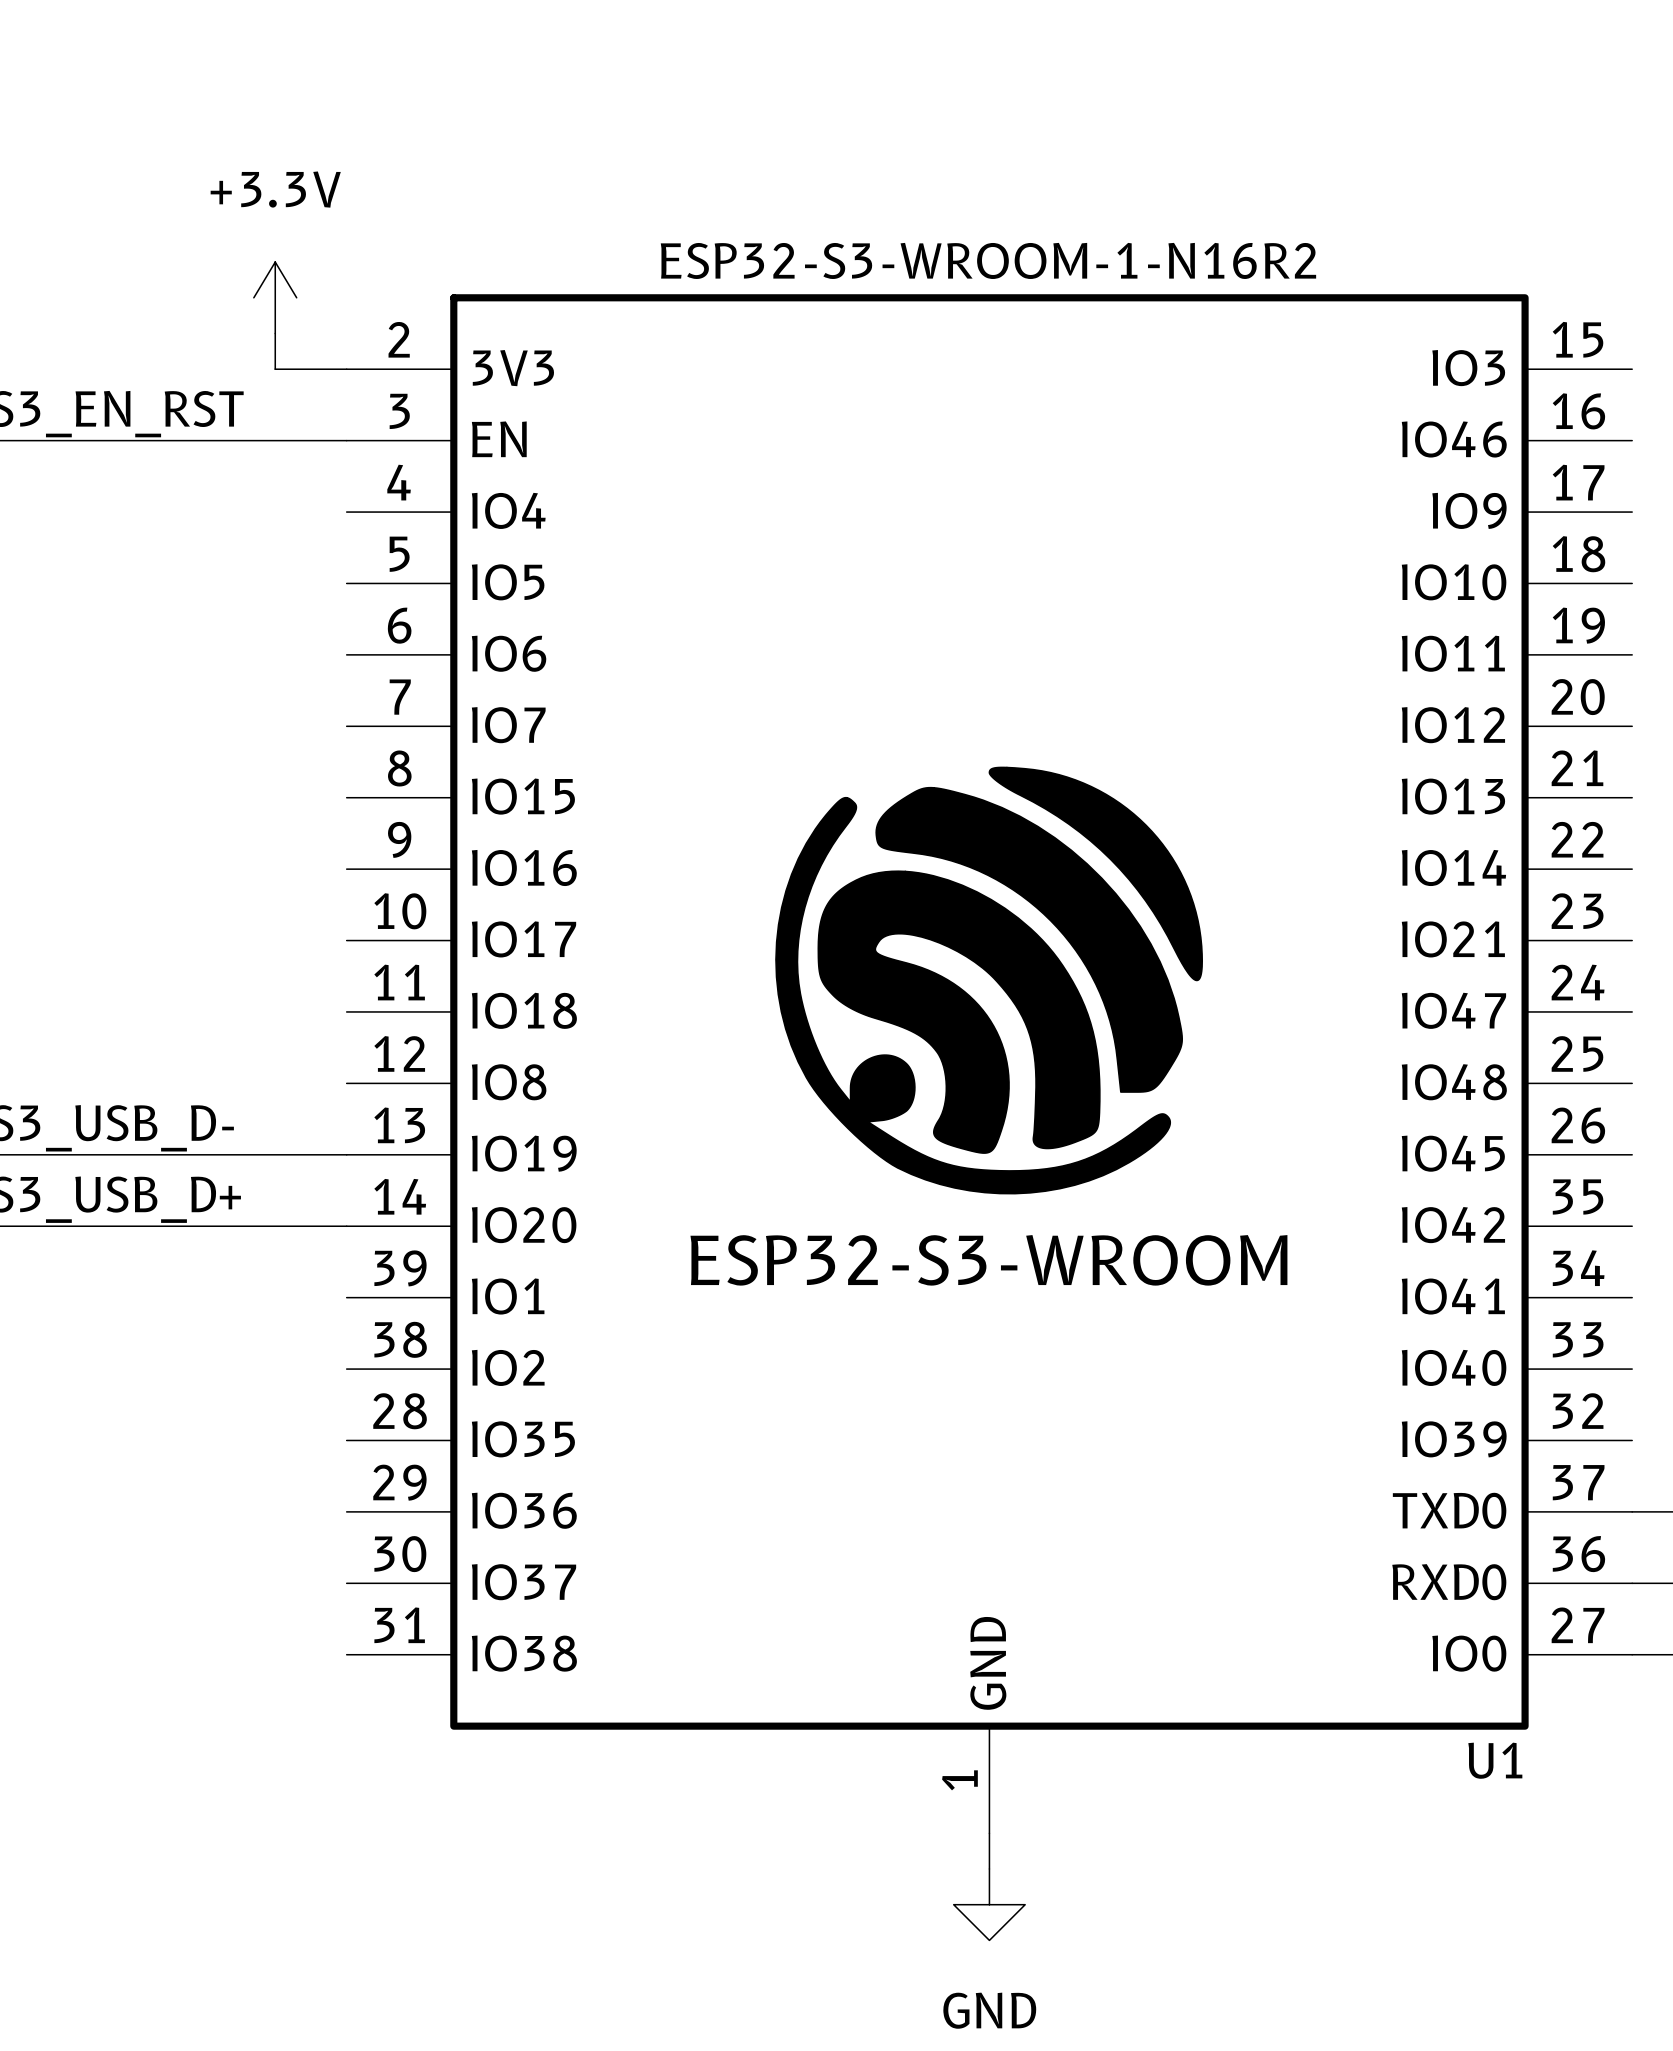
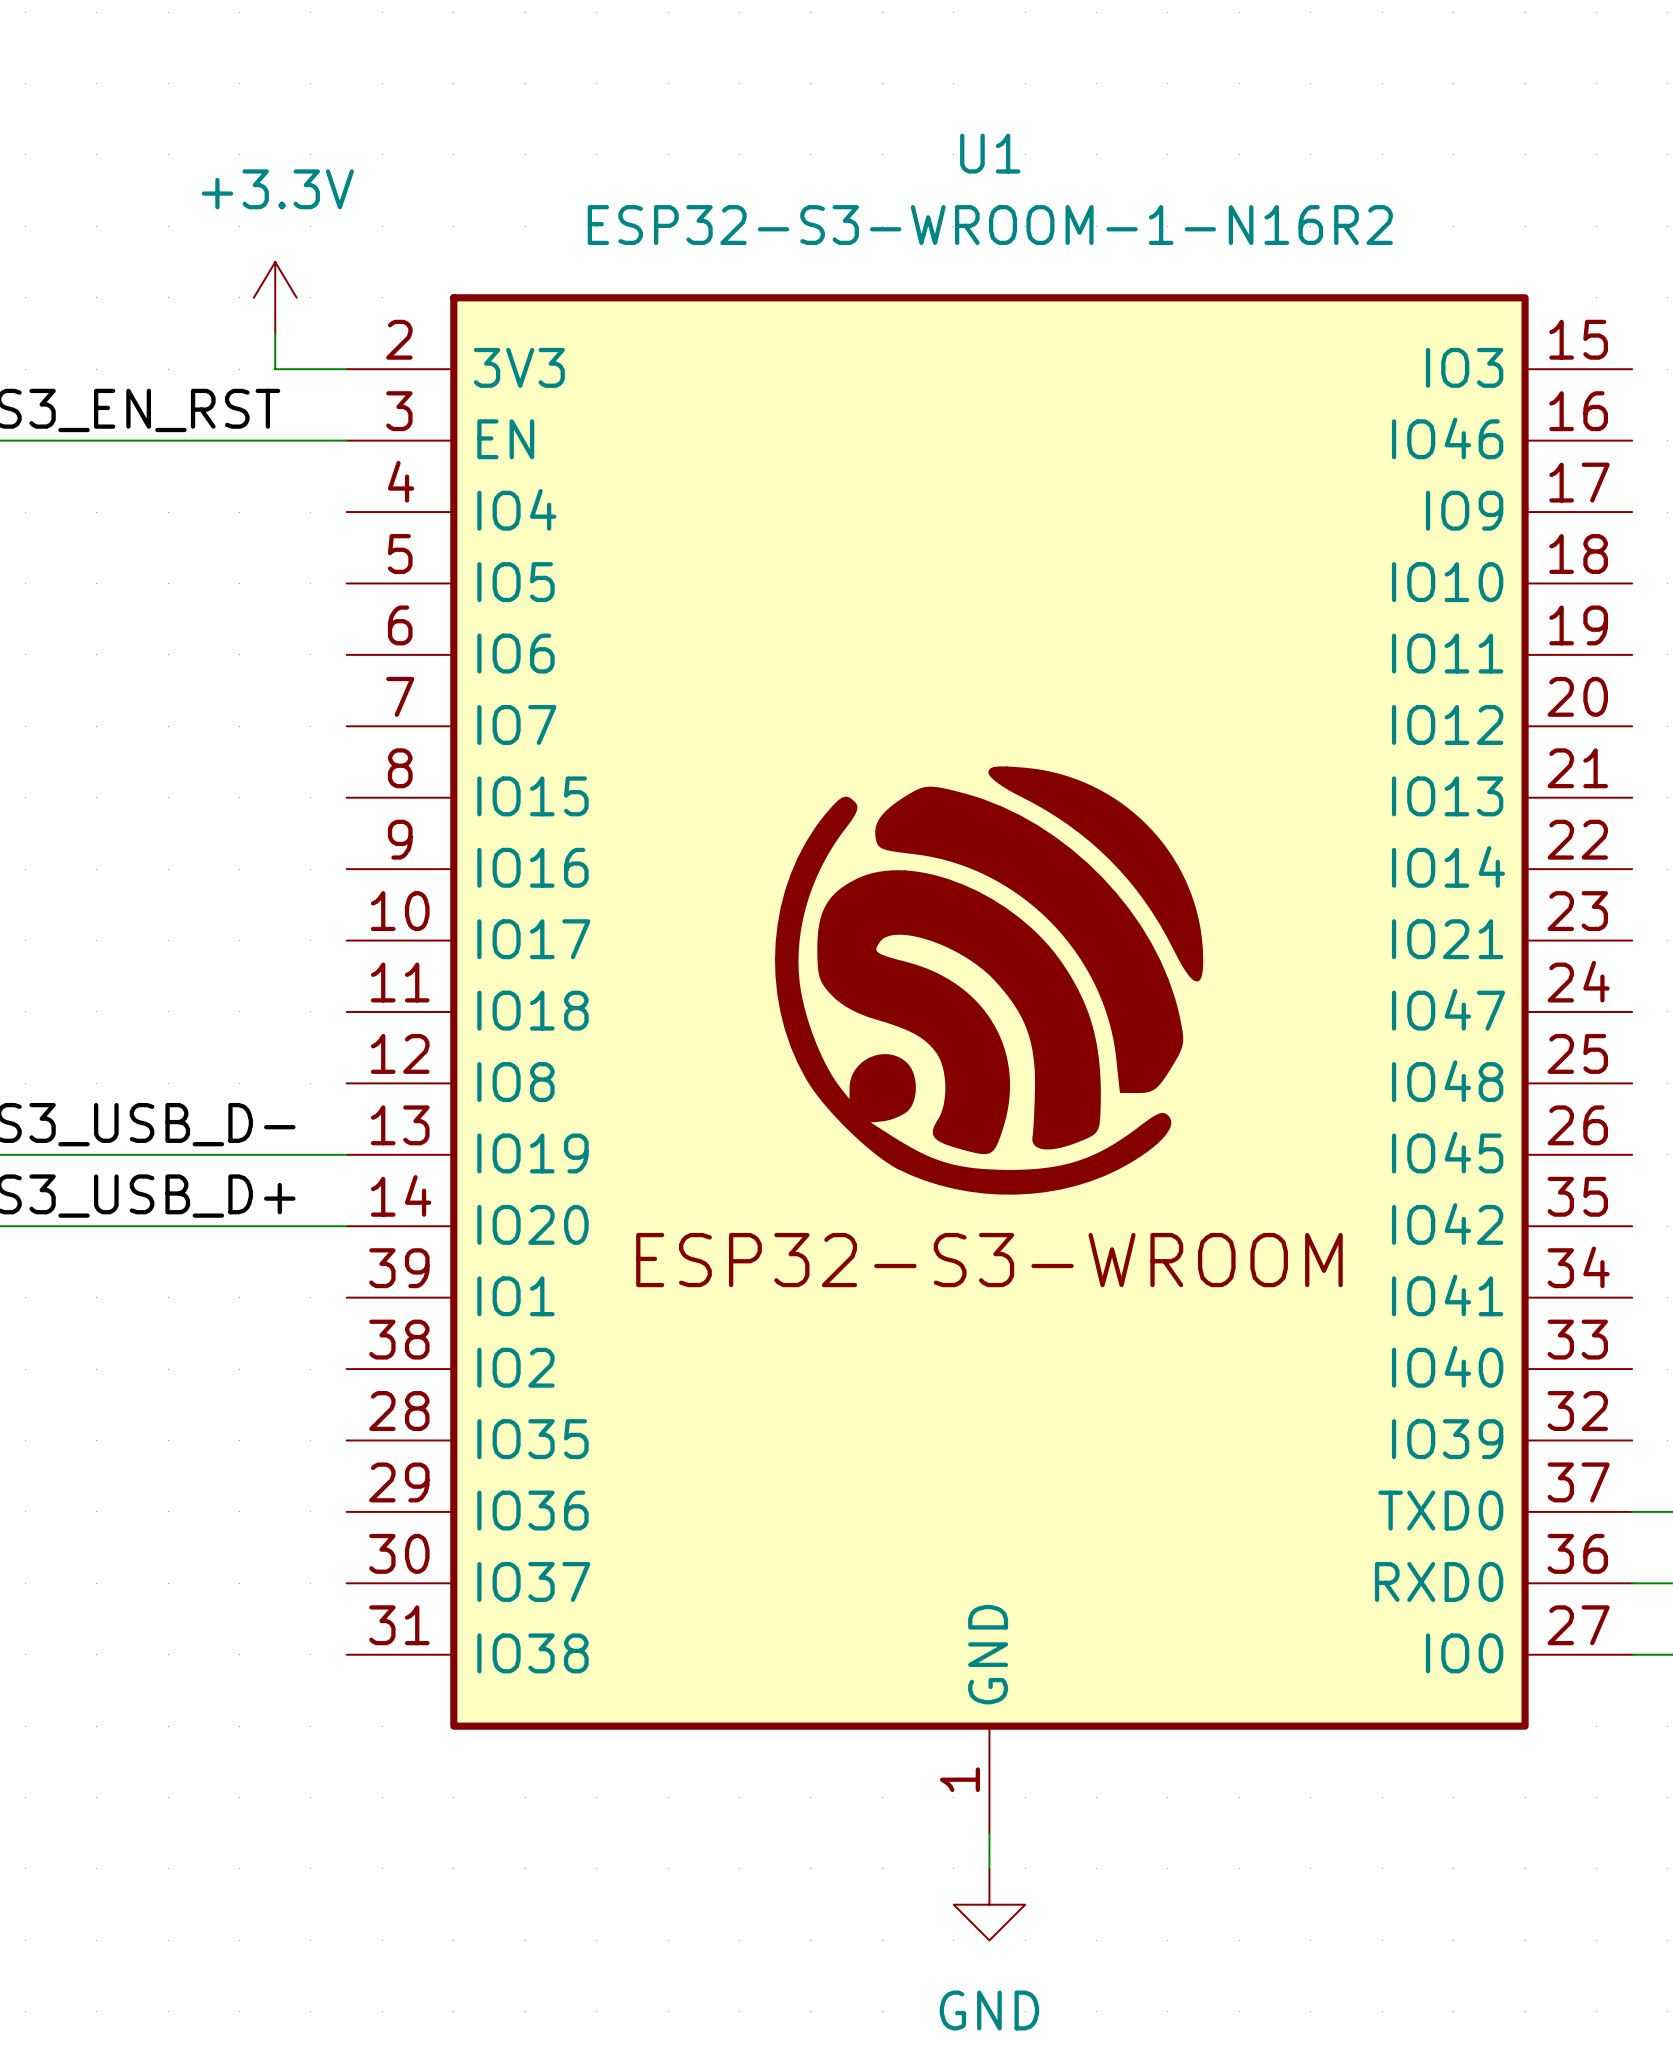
U1 value position: ESP32-S3-WROOM-1-N16R2 (988, 260) -> ESP32-S3-WROOM-1-N16R2 (990, 225)
U1 name position: U1 (1495, 1760) -> U1 (990, 153)

